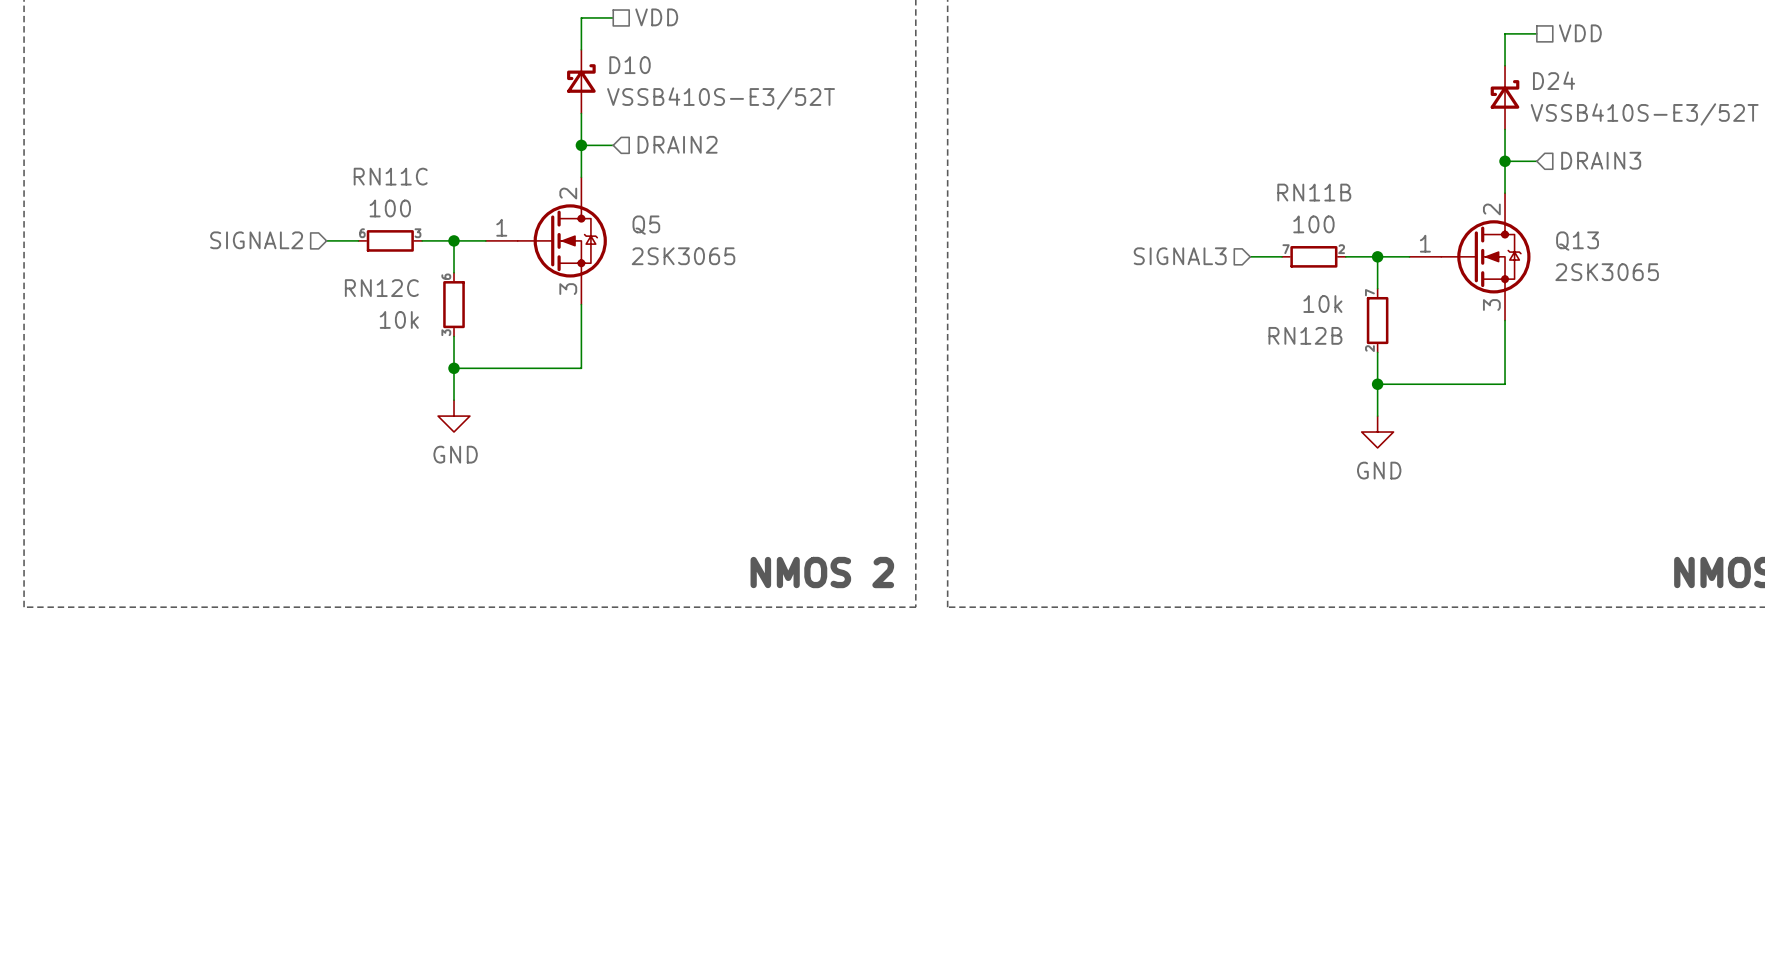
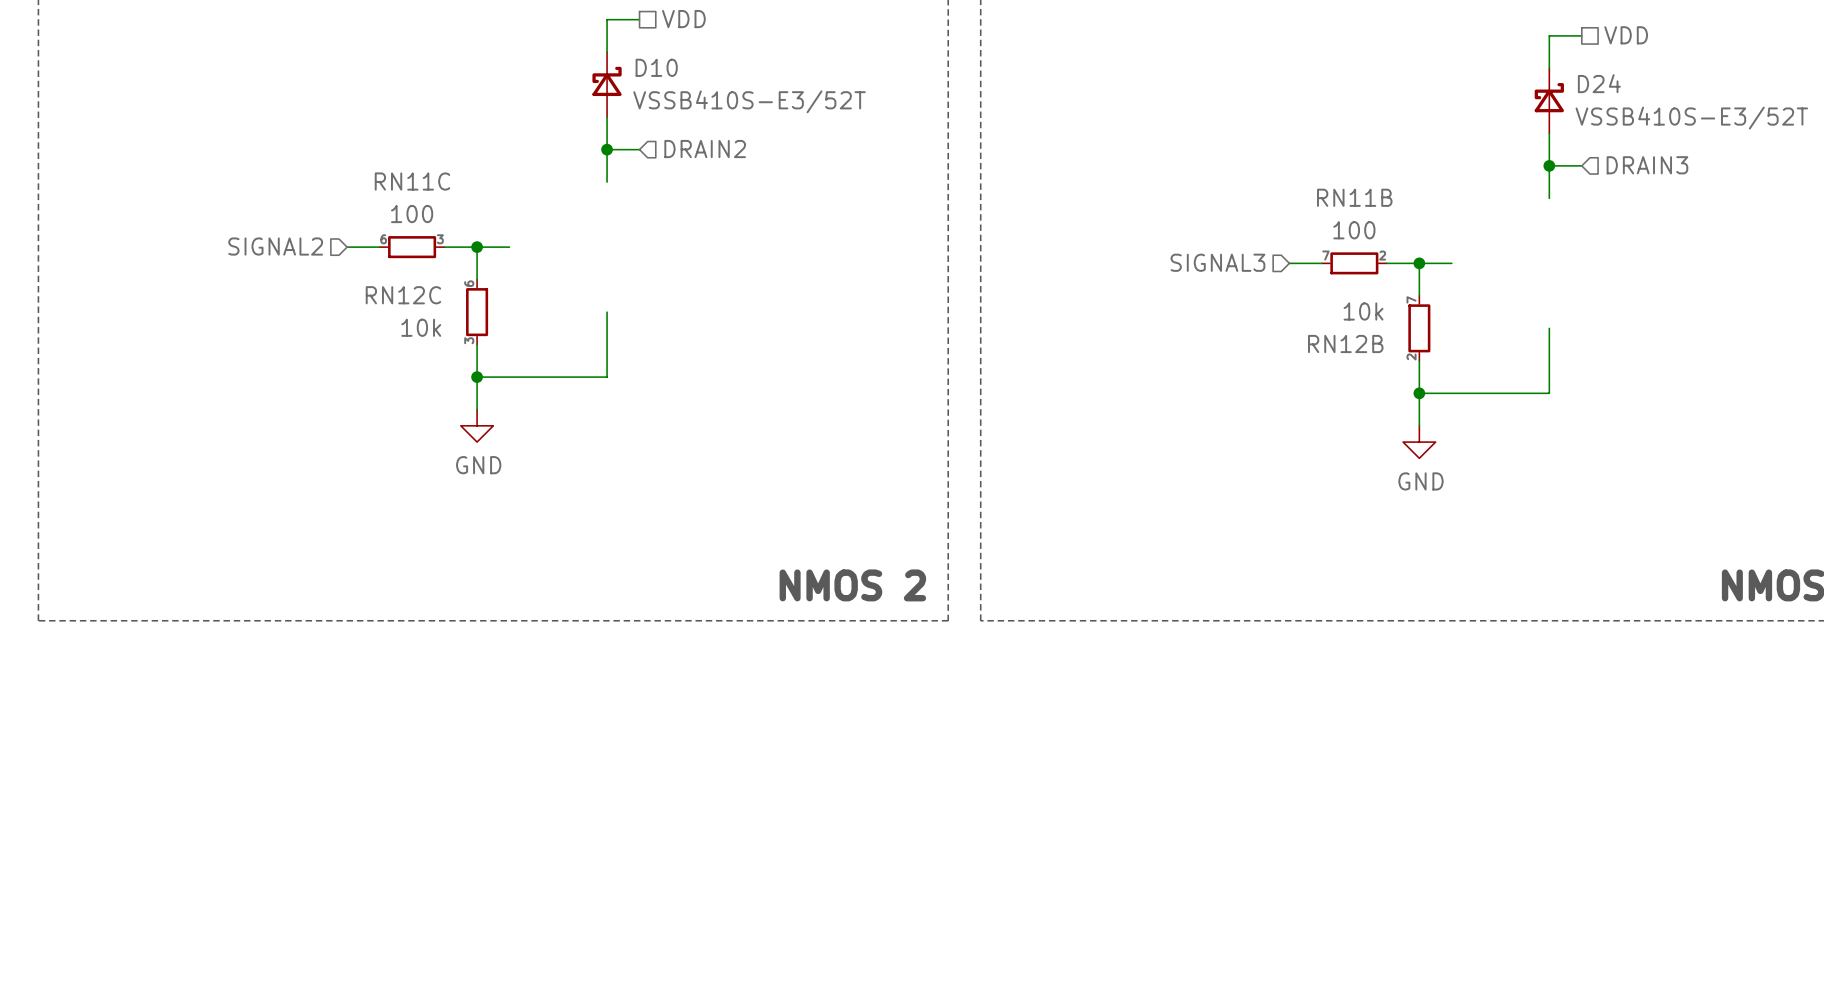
Q5: 2SK3065 (546, 240) -> none
Q13: 2SK3065 (1469, 256) -> none

